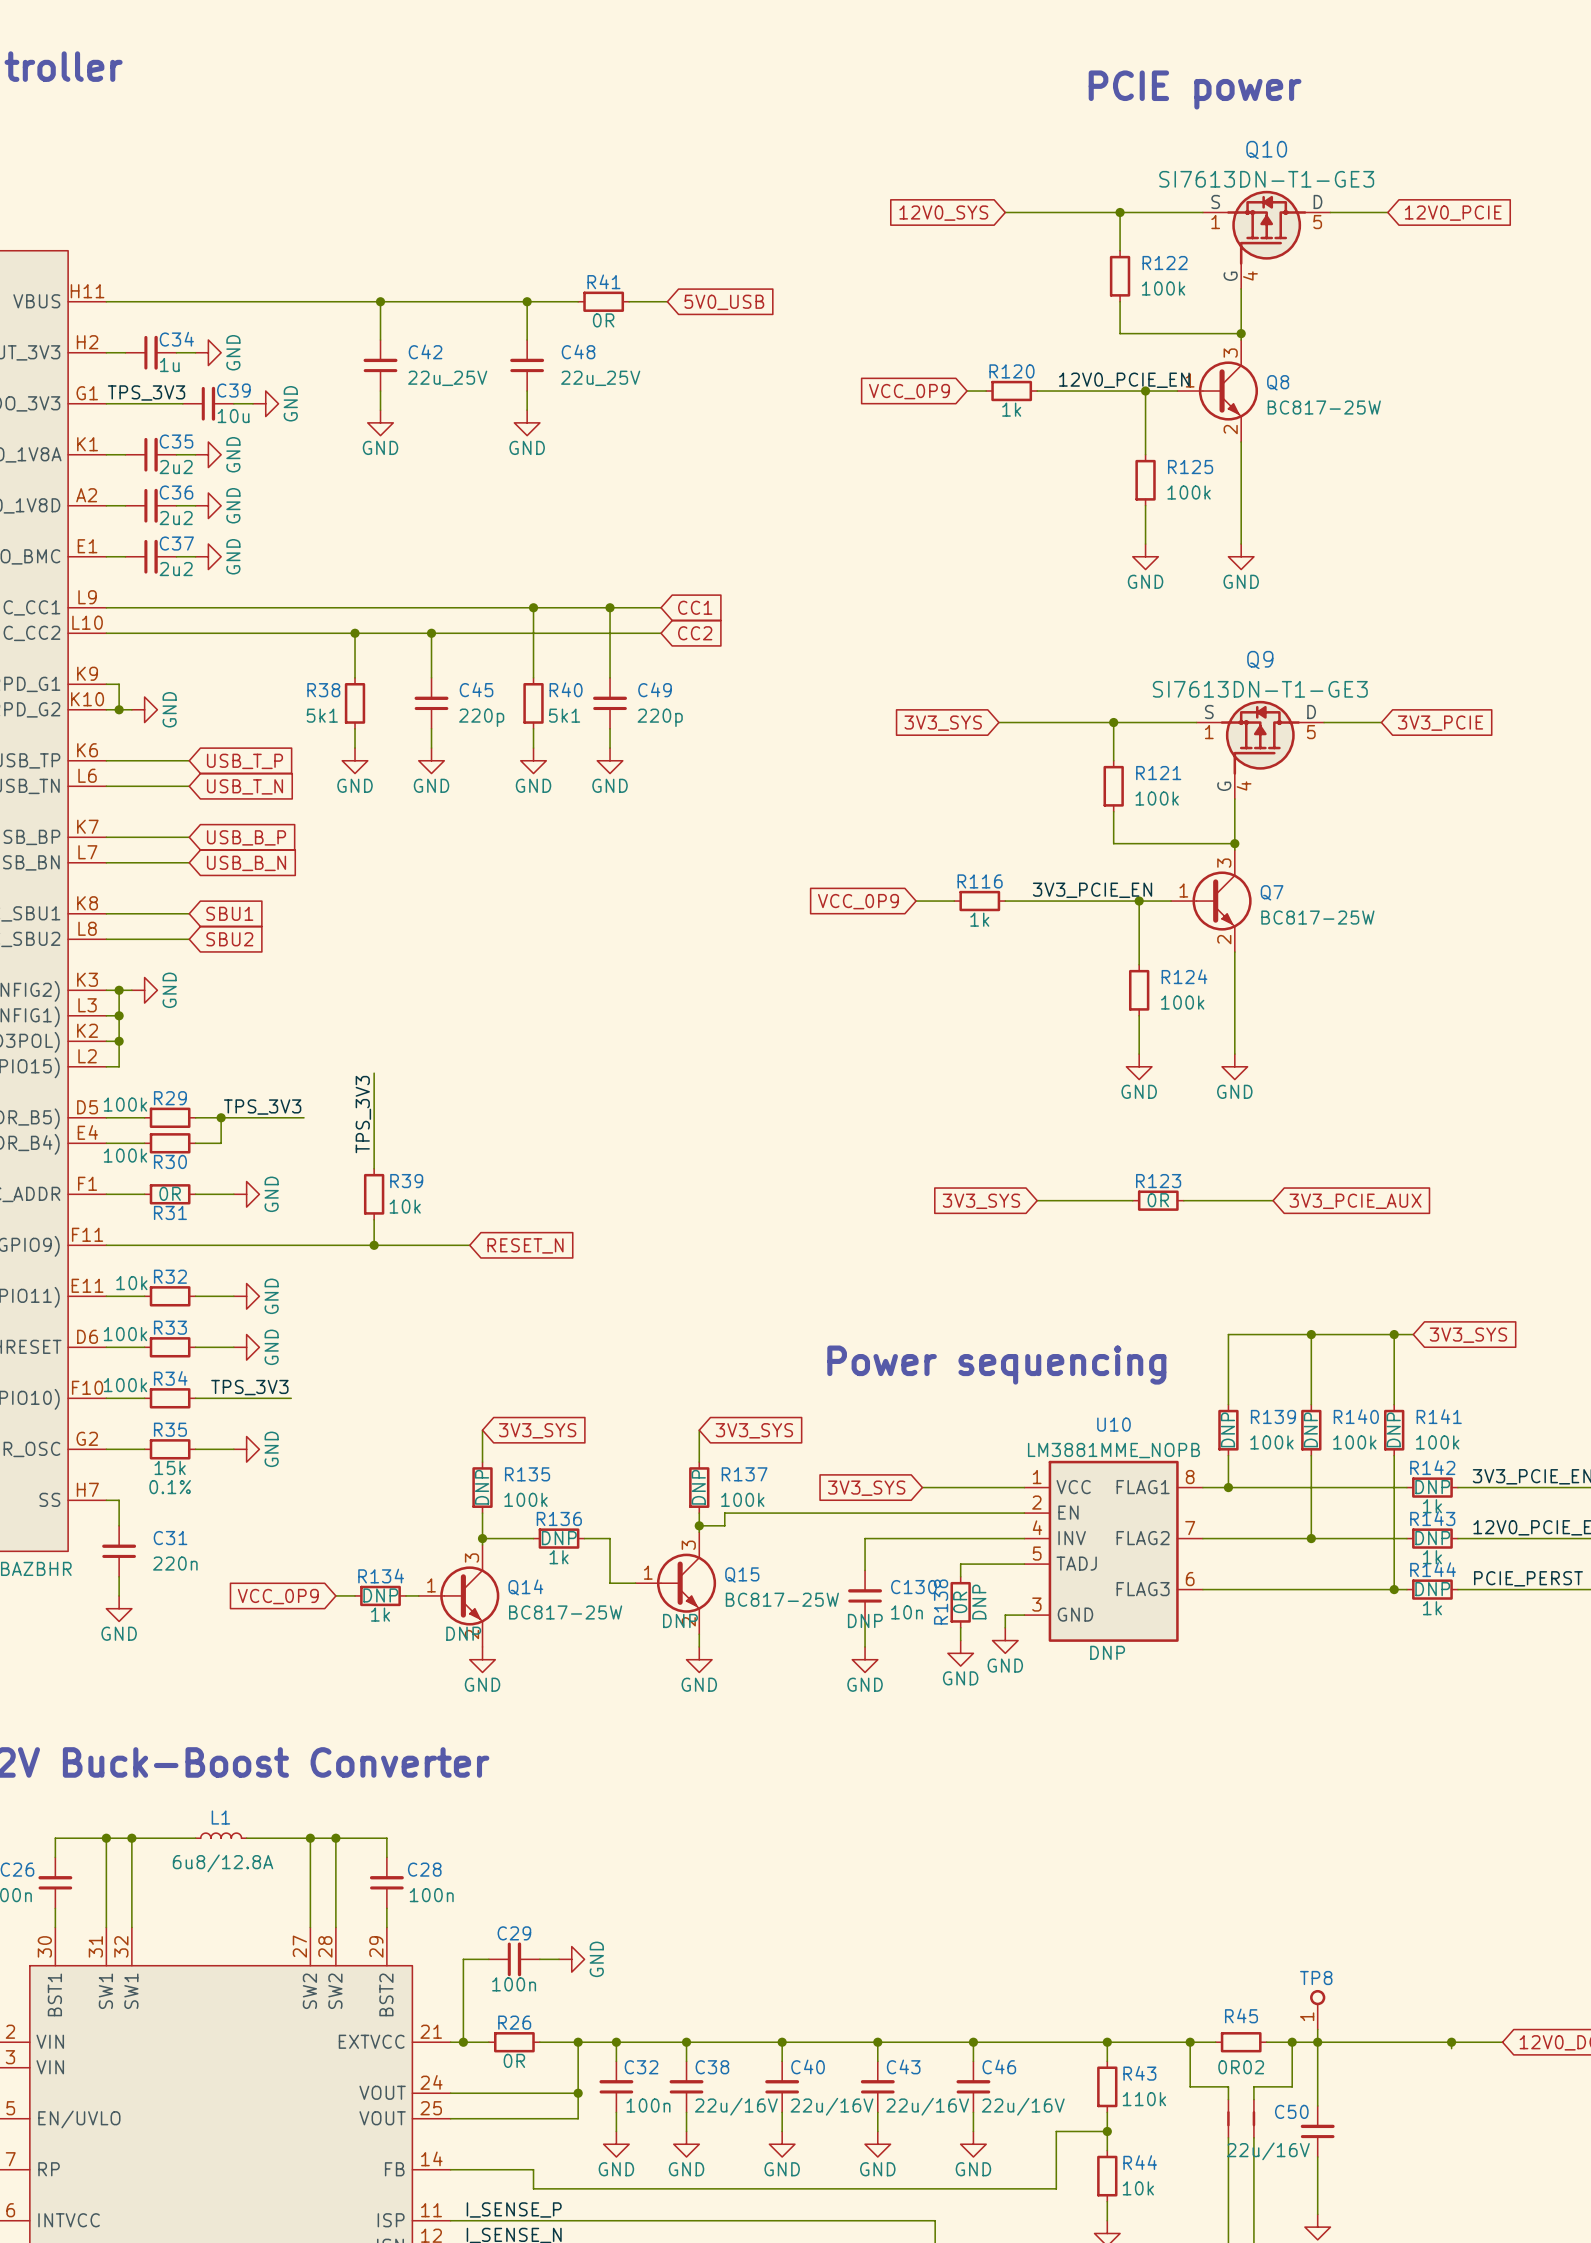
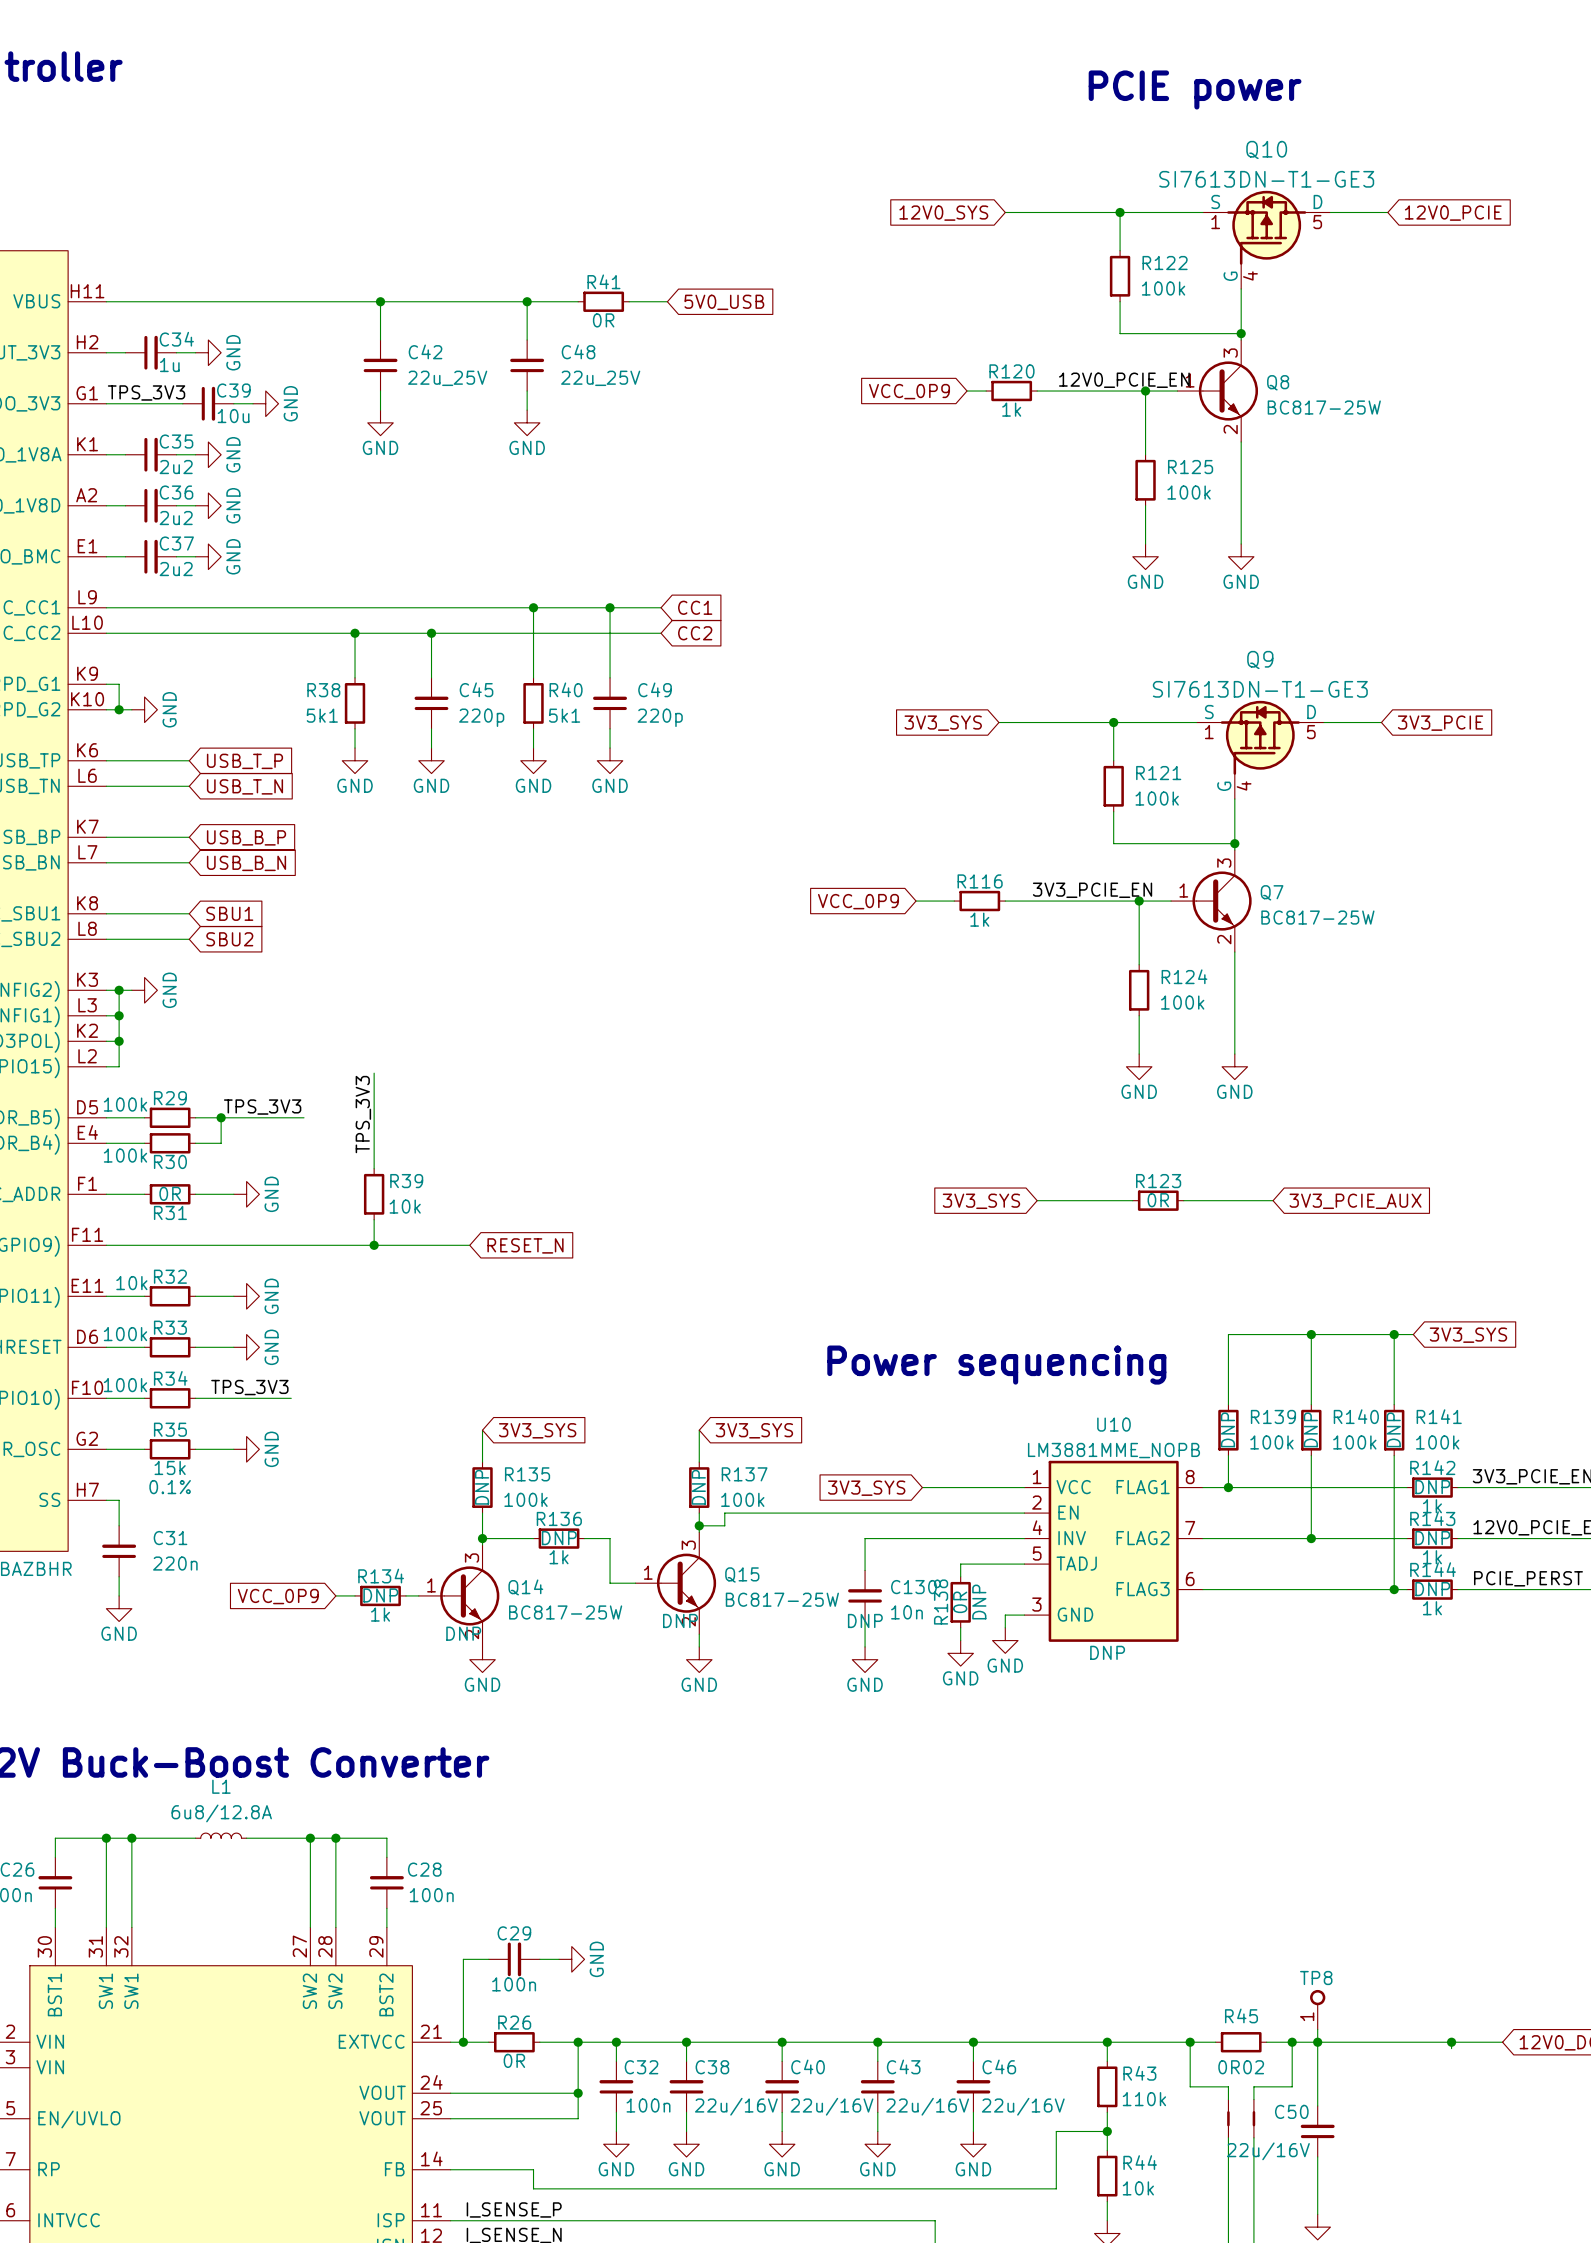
L1 name position: L1 (220, 1817) -> L1 (221, 1786)
L1 text position: 6u8/12.8A (223, 1863) -> 6u8/12.8A (221, 1813)

